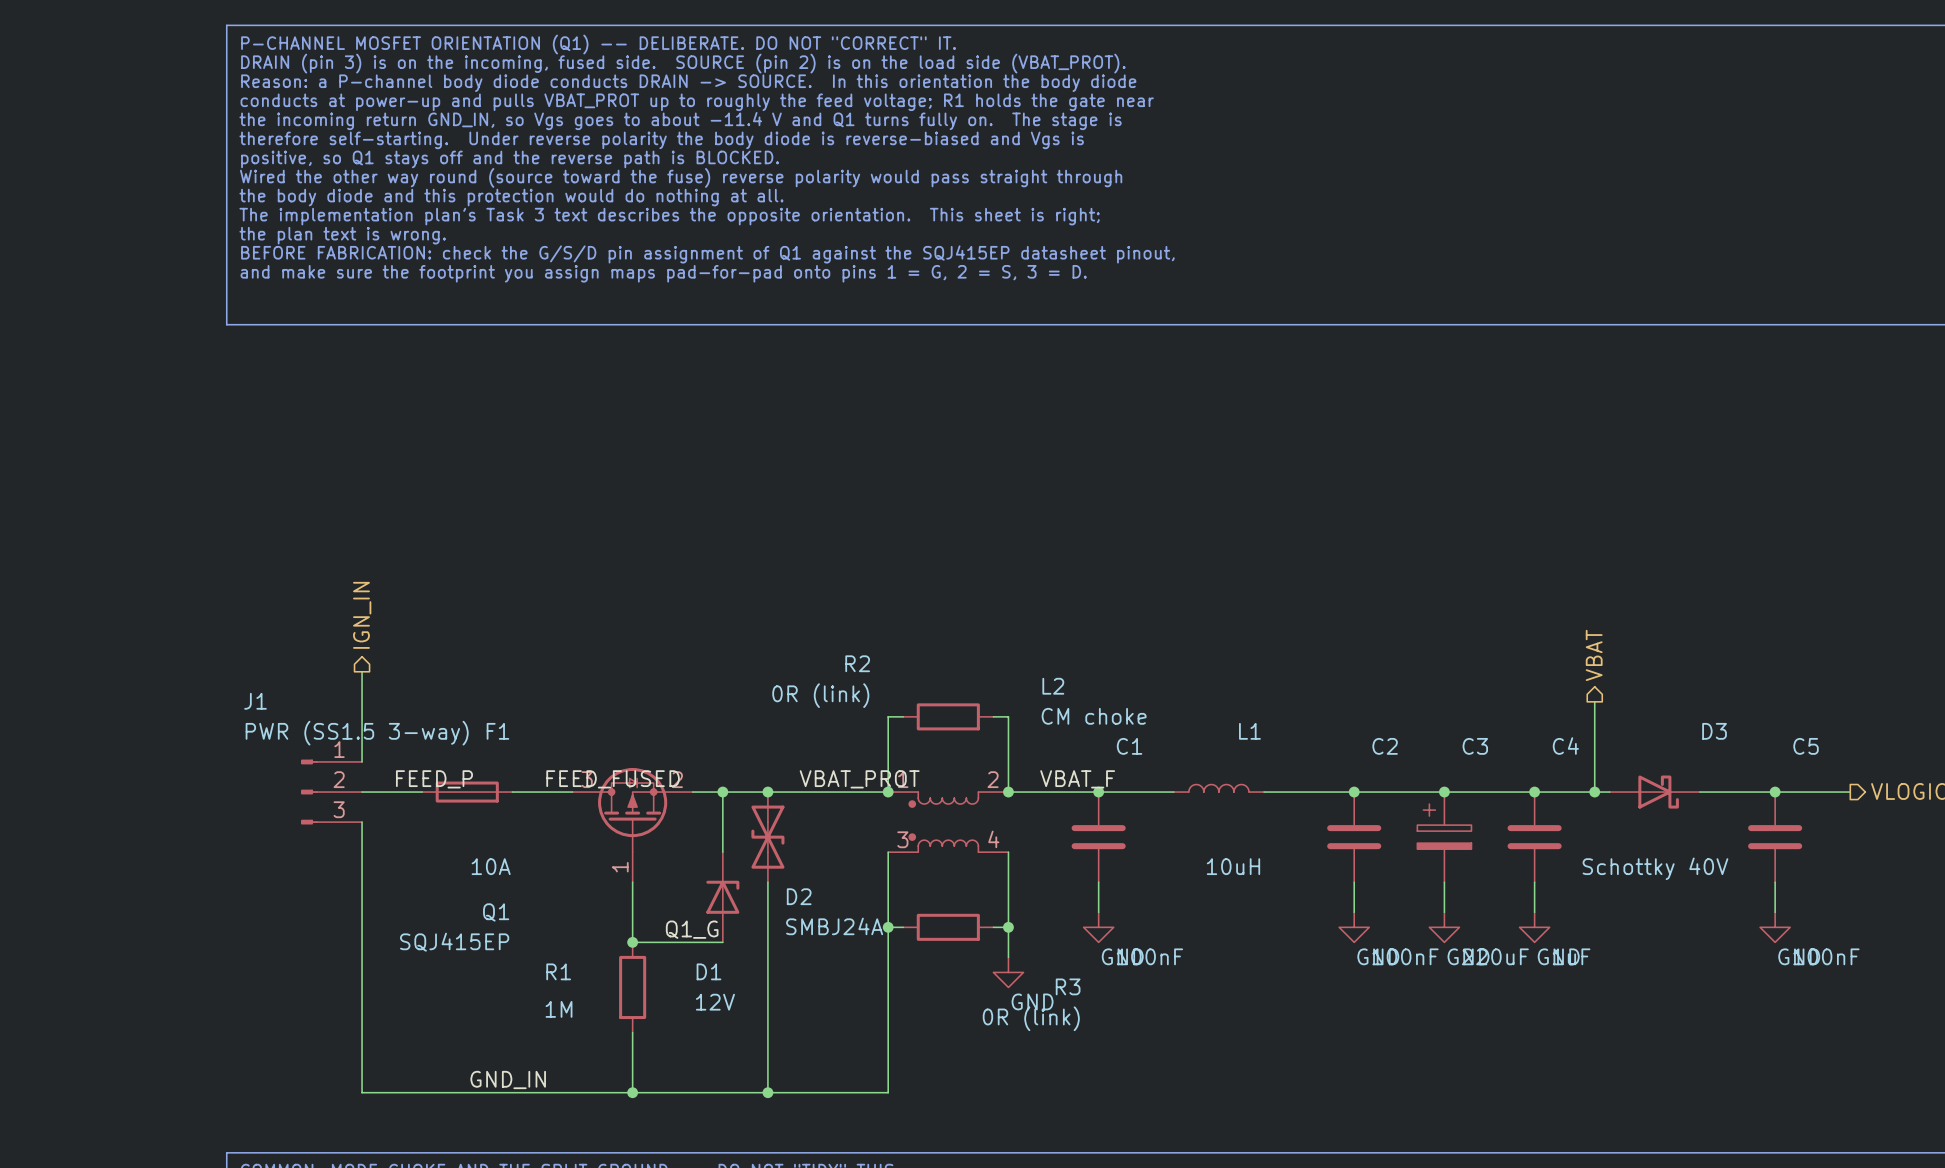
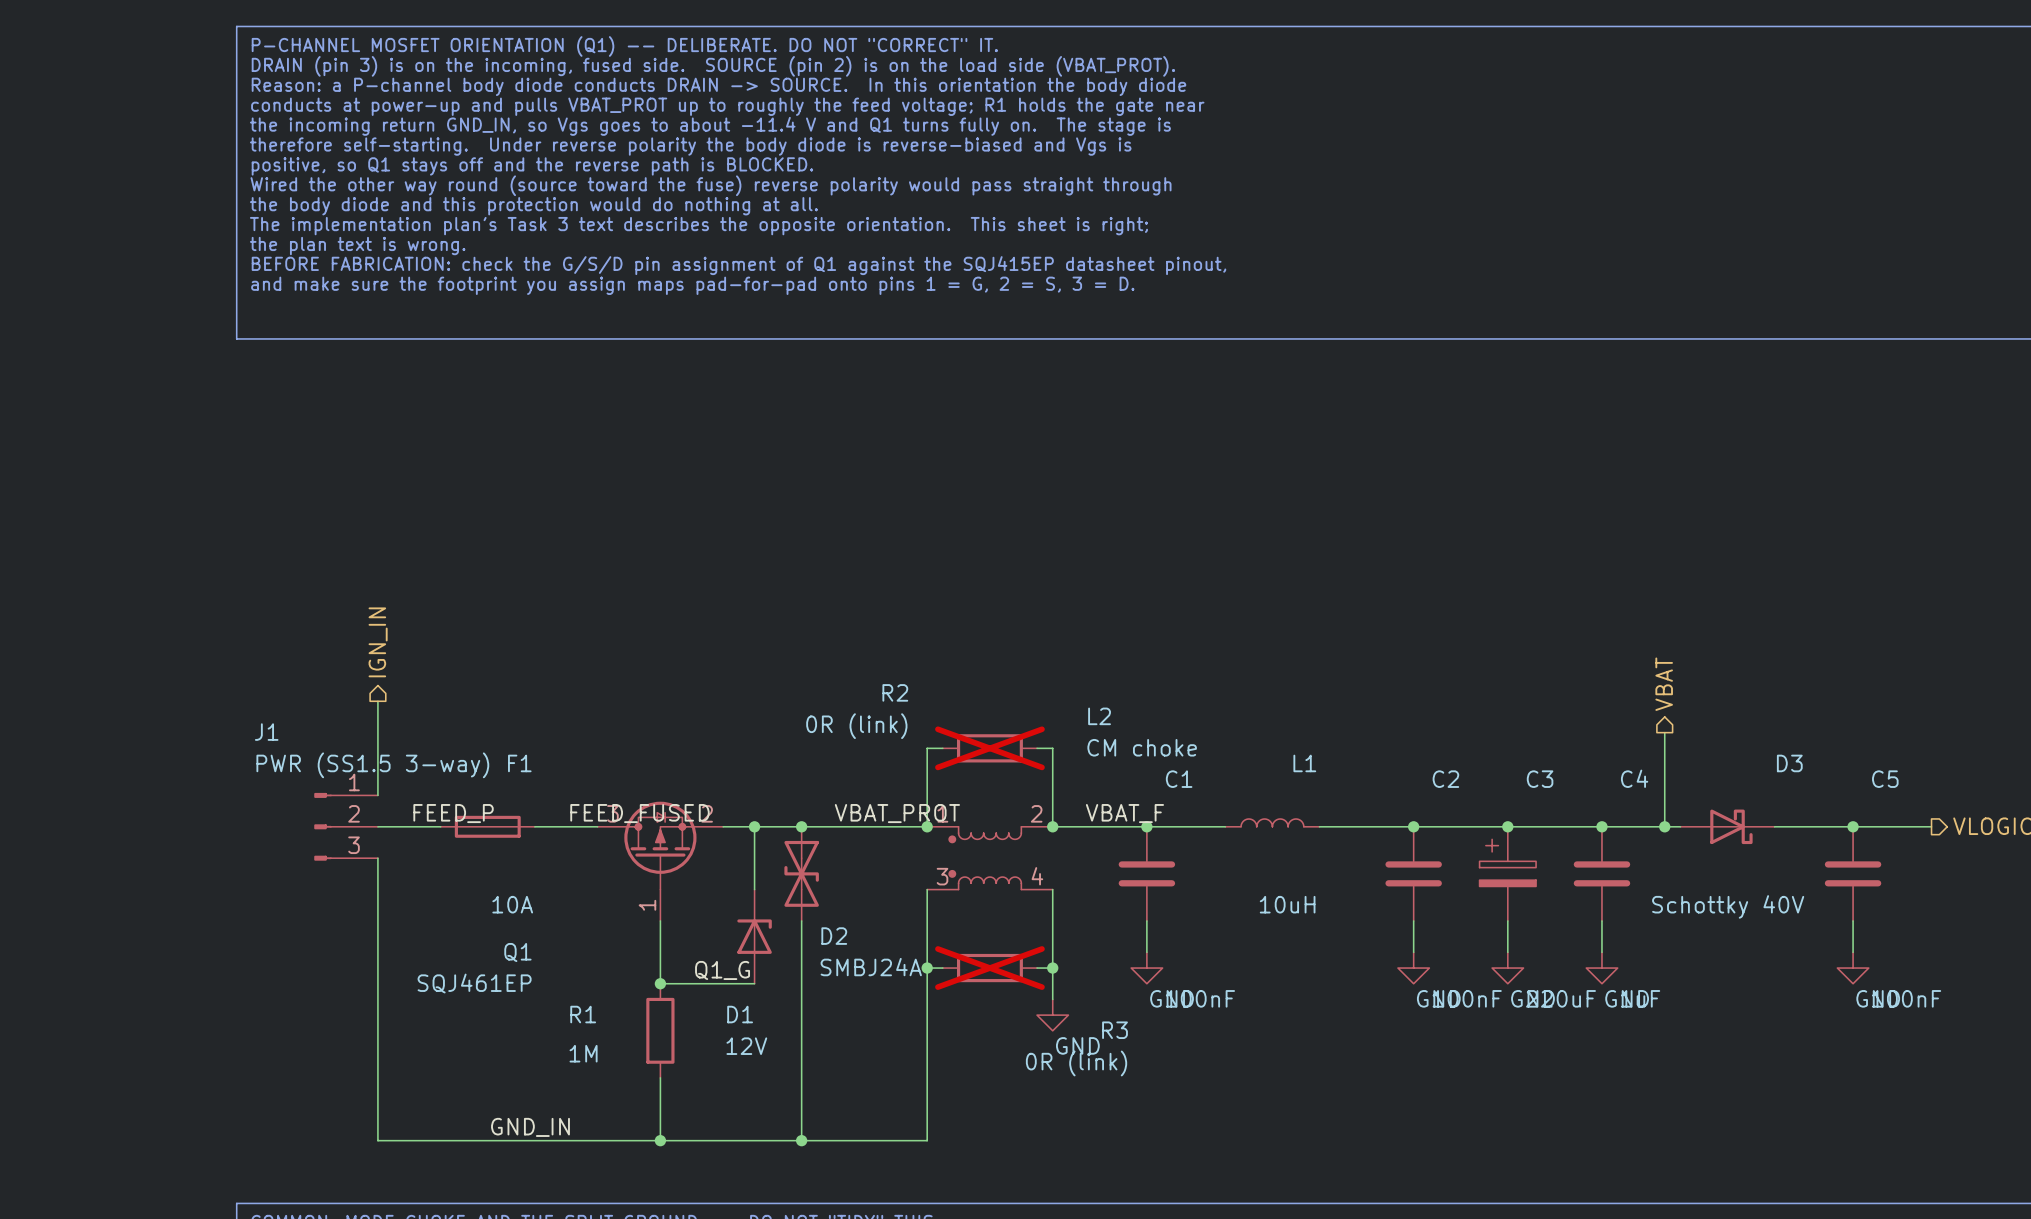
R2 do-not-place cross: none -> (989, 748)
R3 do-not-place cross: none -> (989, 968)
Q1 value: SQJ415EP (454, 942) -> SQJ461EP (474, 983)

